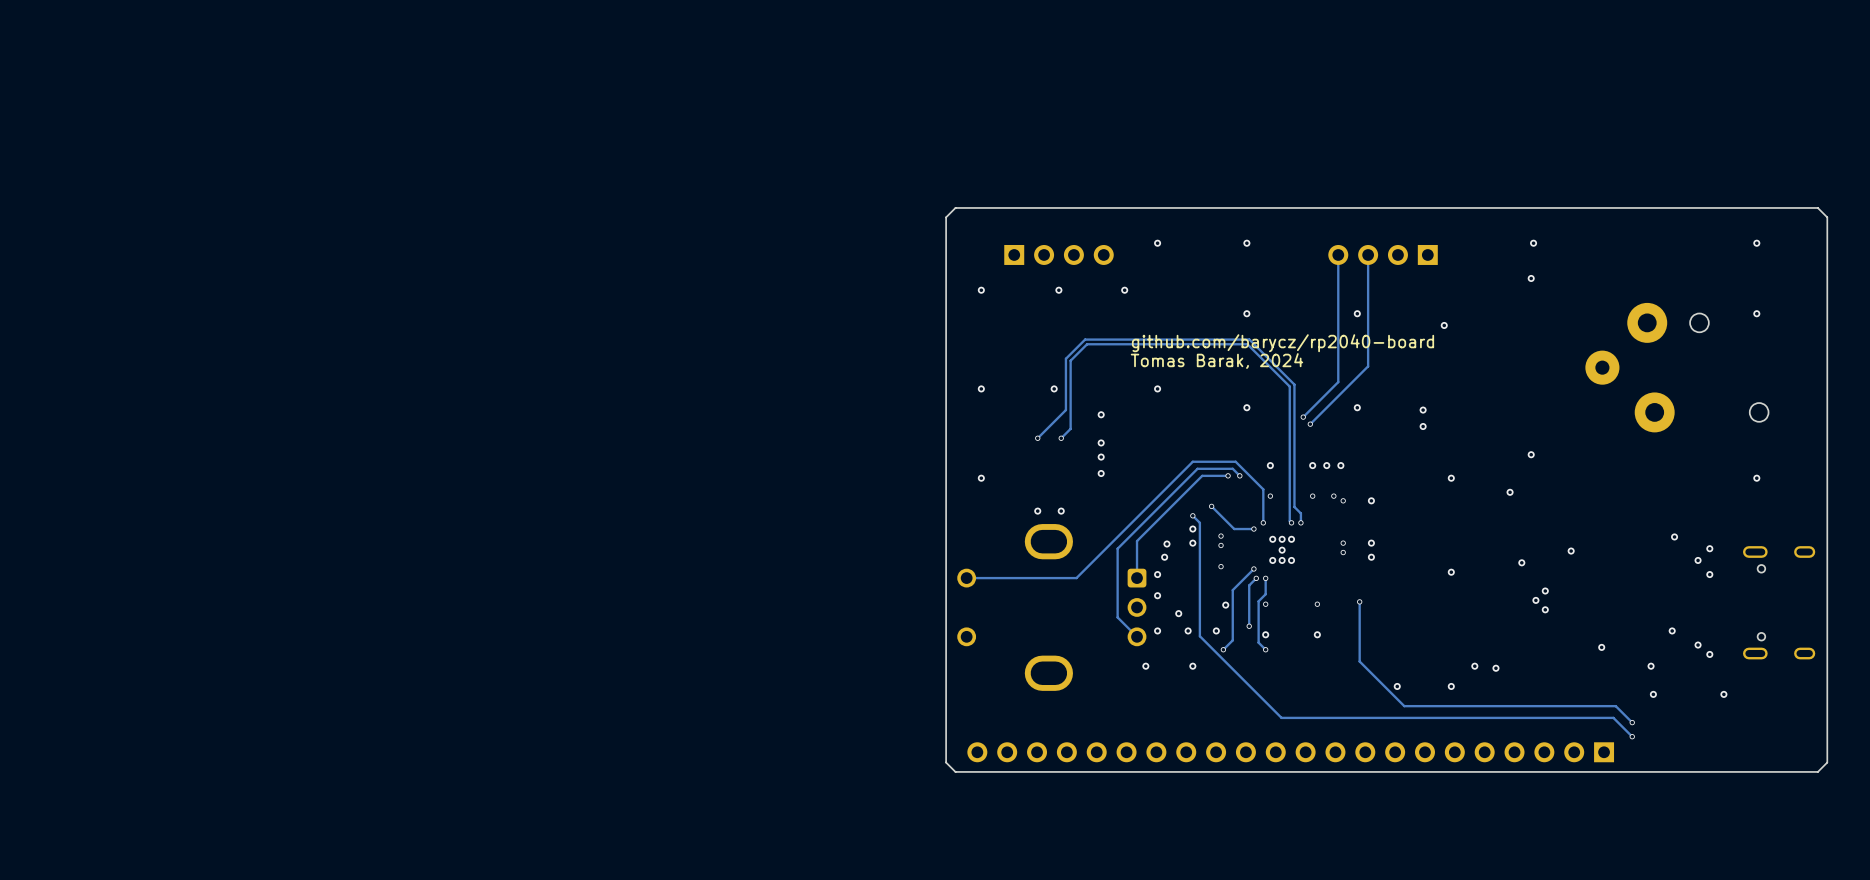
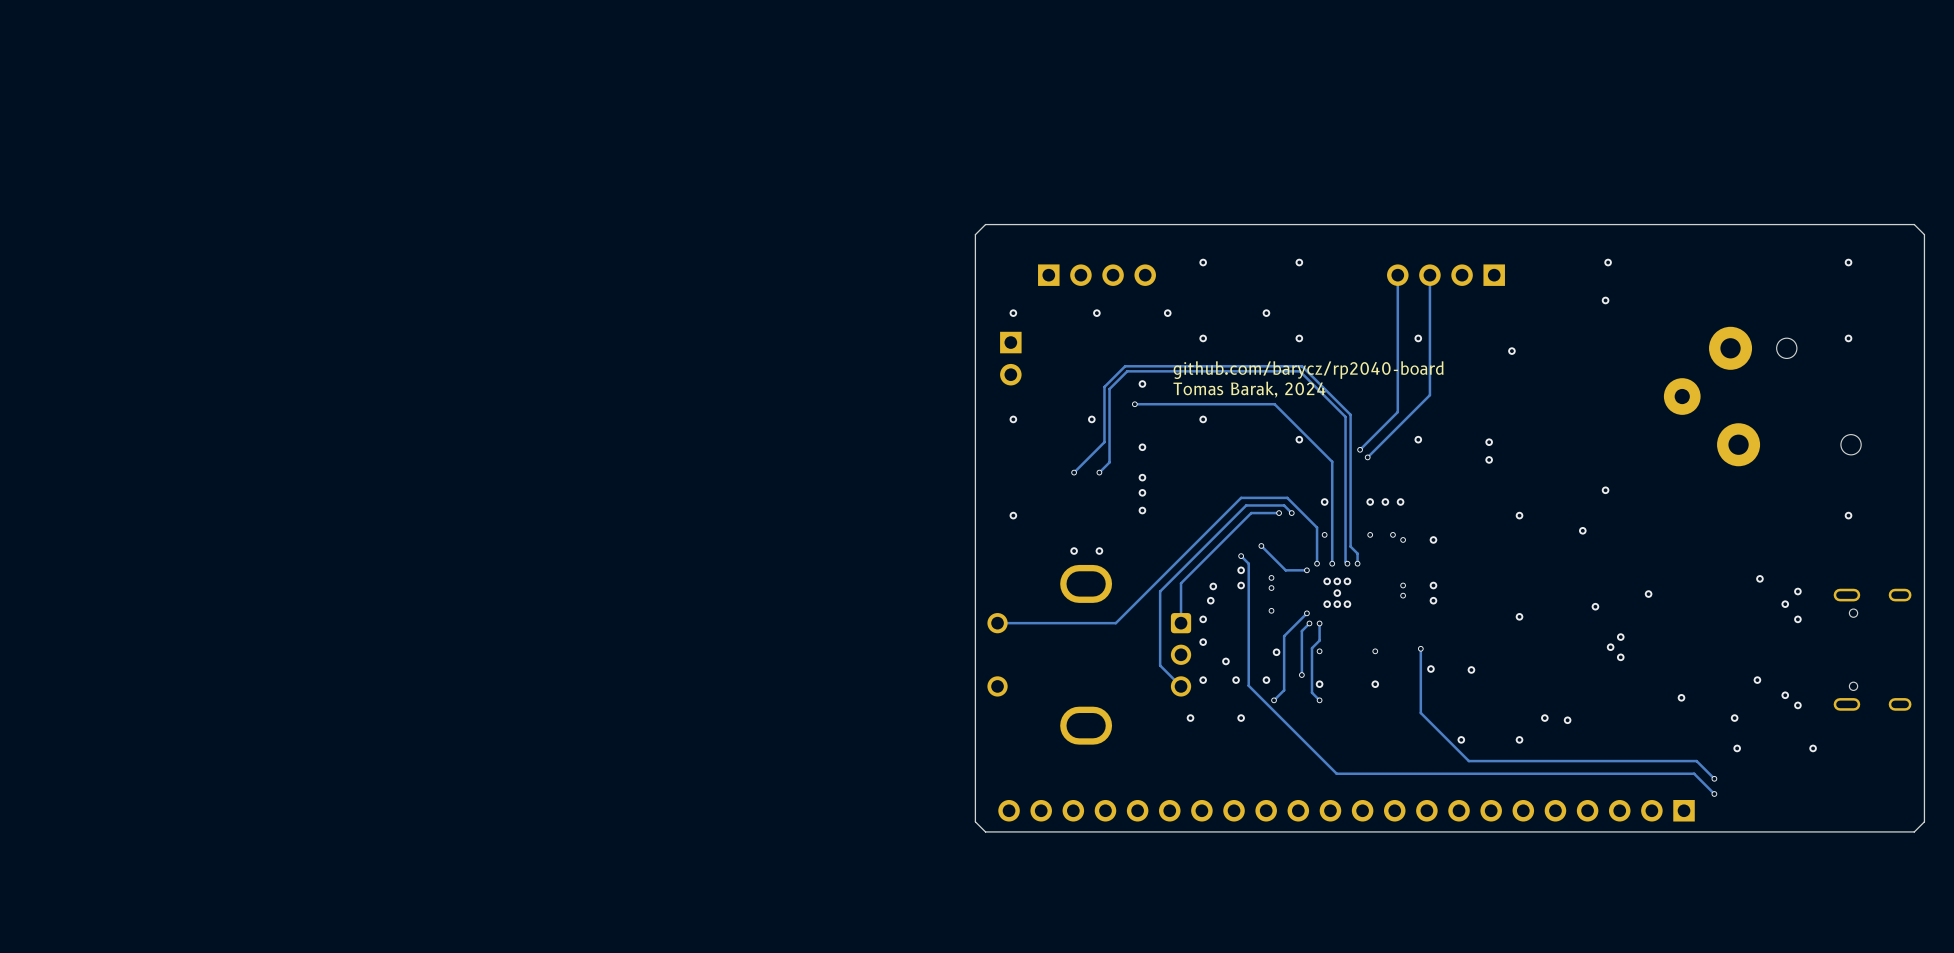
via: none -> (1266, 313)
via: none -> (1203, 338)
part: none -> (1010, 358)
via: none -> (1142, 384)
track: none -> (1134, 404) (1274, 404) (1332, 461) (1332, 563)
via: none -> (1134, 404)
via: none -> (1332, 563)
via: none -> (1430, 669)
via: none -> (1471, 669)

